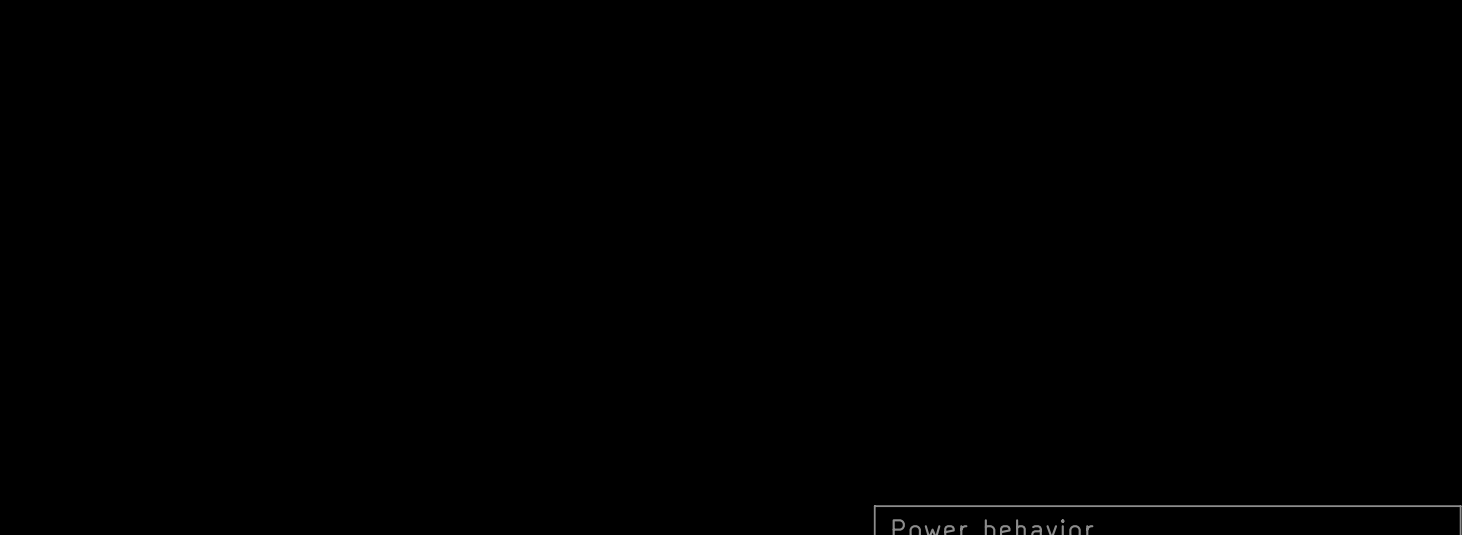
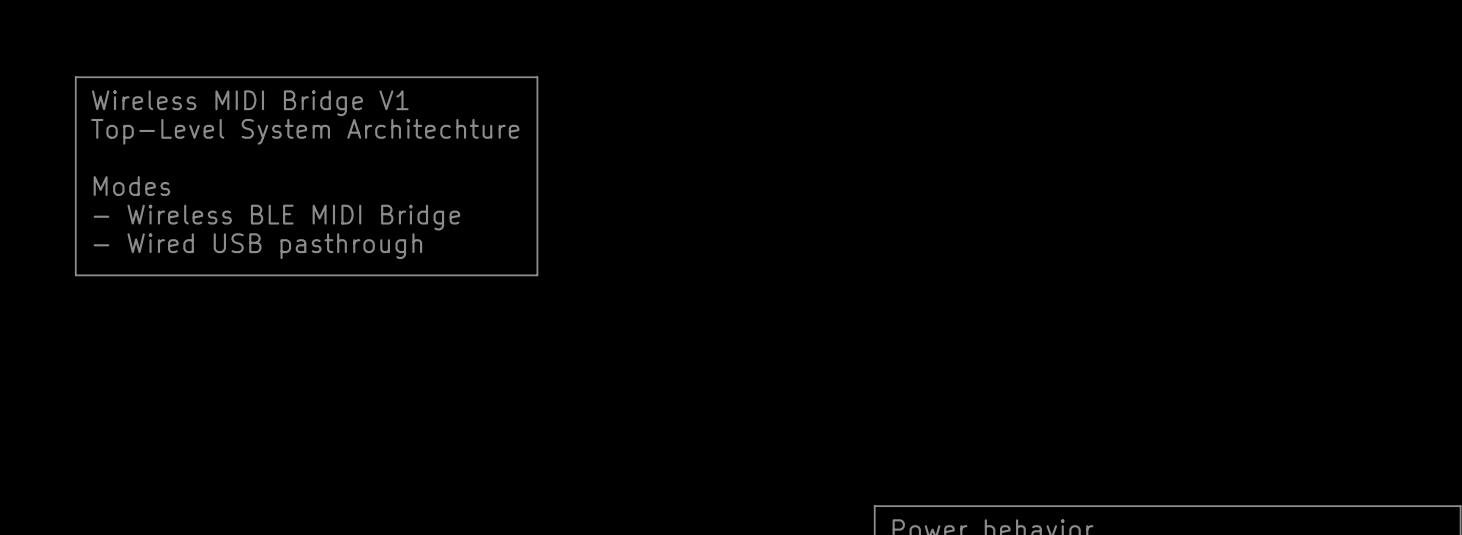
line: none -> (75, 77) (537, 77) (537, 275) (75, 275) (75, 77)
text: none -> Wireless MIDI Bridge V1 (250, 103)
text: none -> Top-Level System Architechture (305, 131)
text: none -> Modes (131, 186)
text: none -> - Wireless BLE MIDI Bridge (276, 217)
text: none -> - Wired USB pasthrough (257, 246)

